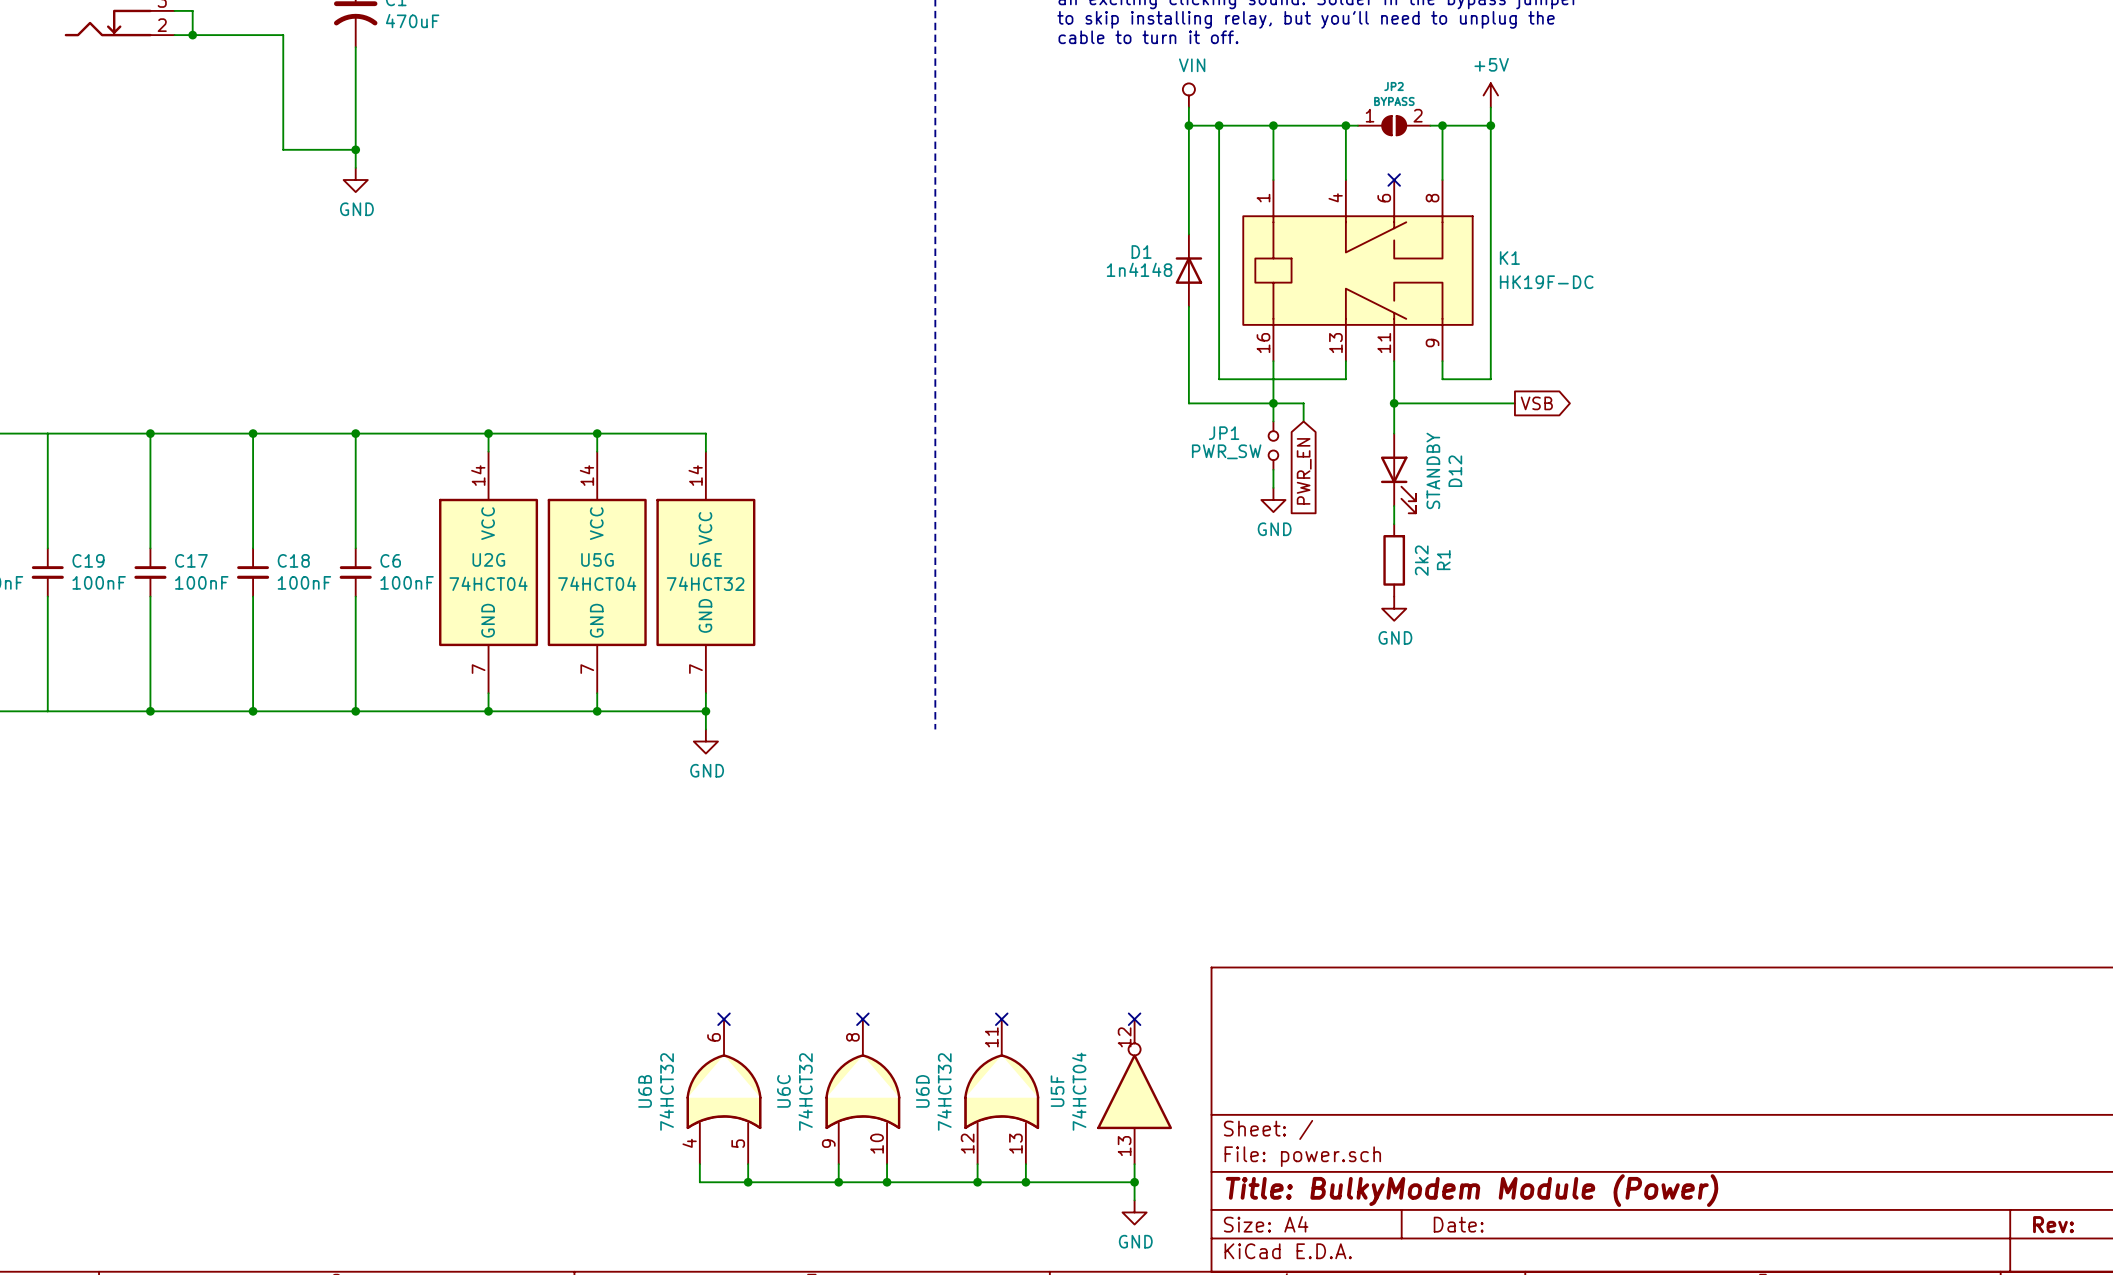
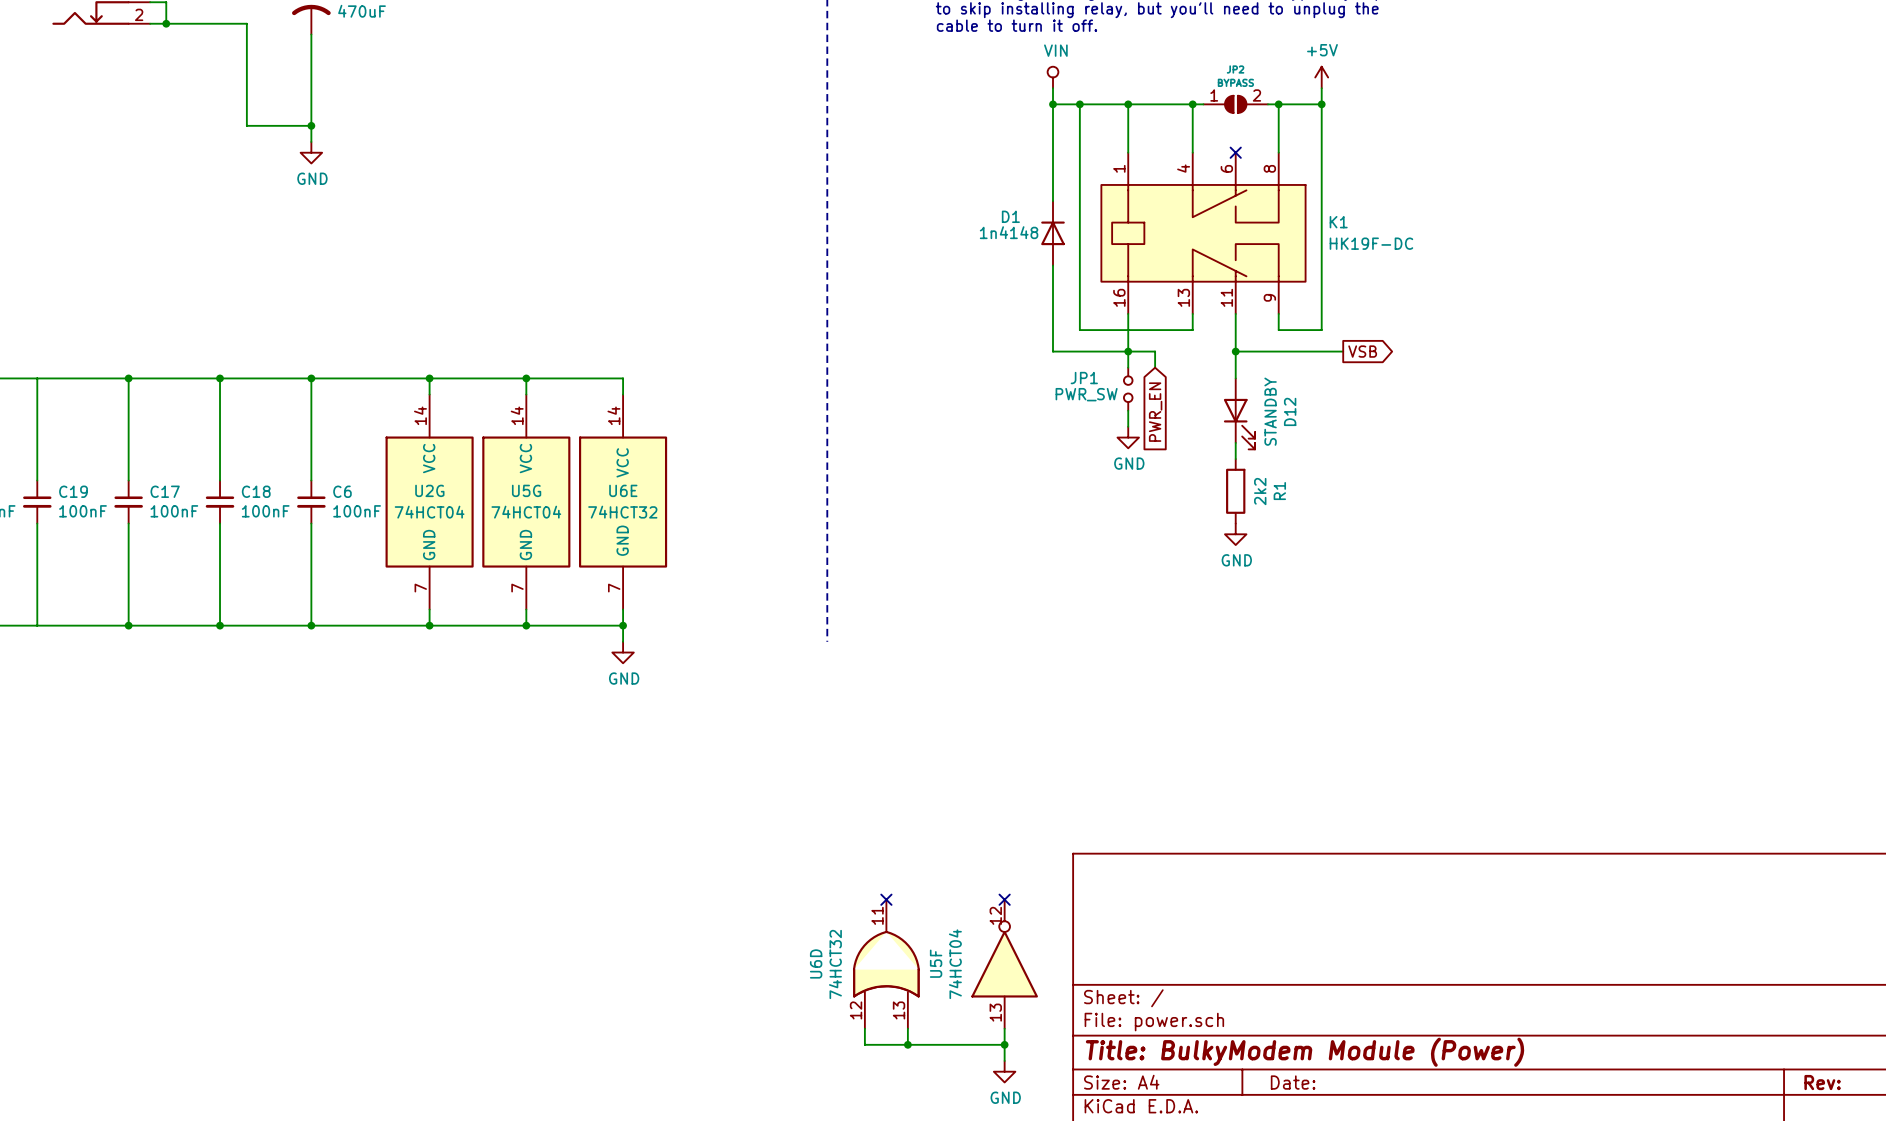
no-connect mark: (724, 1019) -> none
no-connect mark: (862, 1019) -> none
U6B: 74HCT32 (724, 1091) -> none
U6C: 74HCT32 (862, 1091) -> none
wire: (699, 1164) (699, 1182) (977, 1182) -> none
wire: (748, 1164) (748, 1182) -> none
wire: (838, 1164) (838, 1182) -> none
wire: (887, 1164) (887, 1182) -> none
junction: (748, 1182) -> none
junction: (838, 1182) -> none
junction: (887, 1182) -> none
junction: (977, 1182) -> none

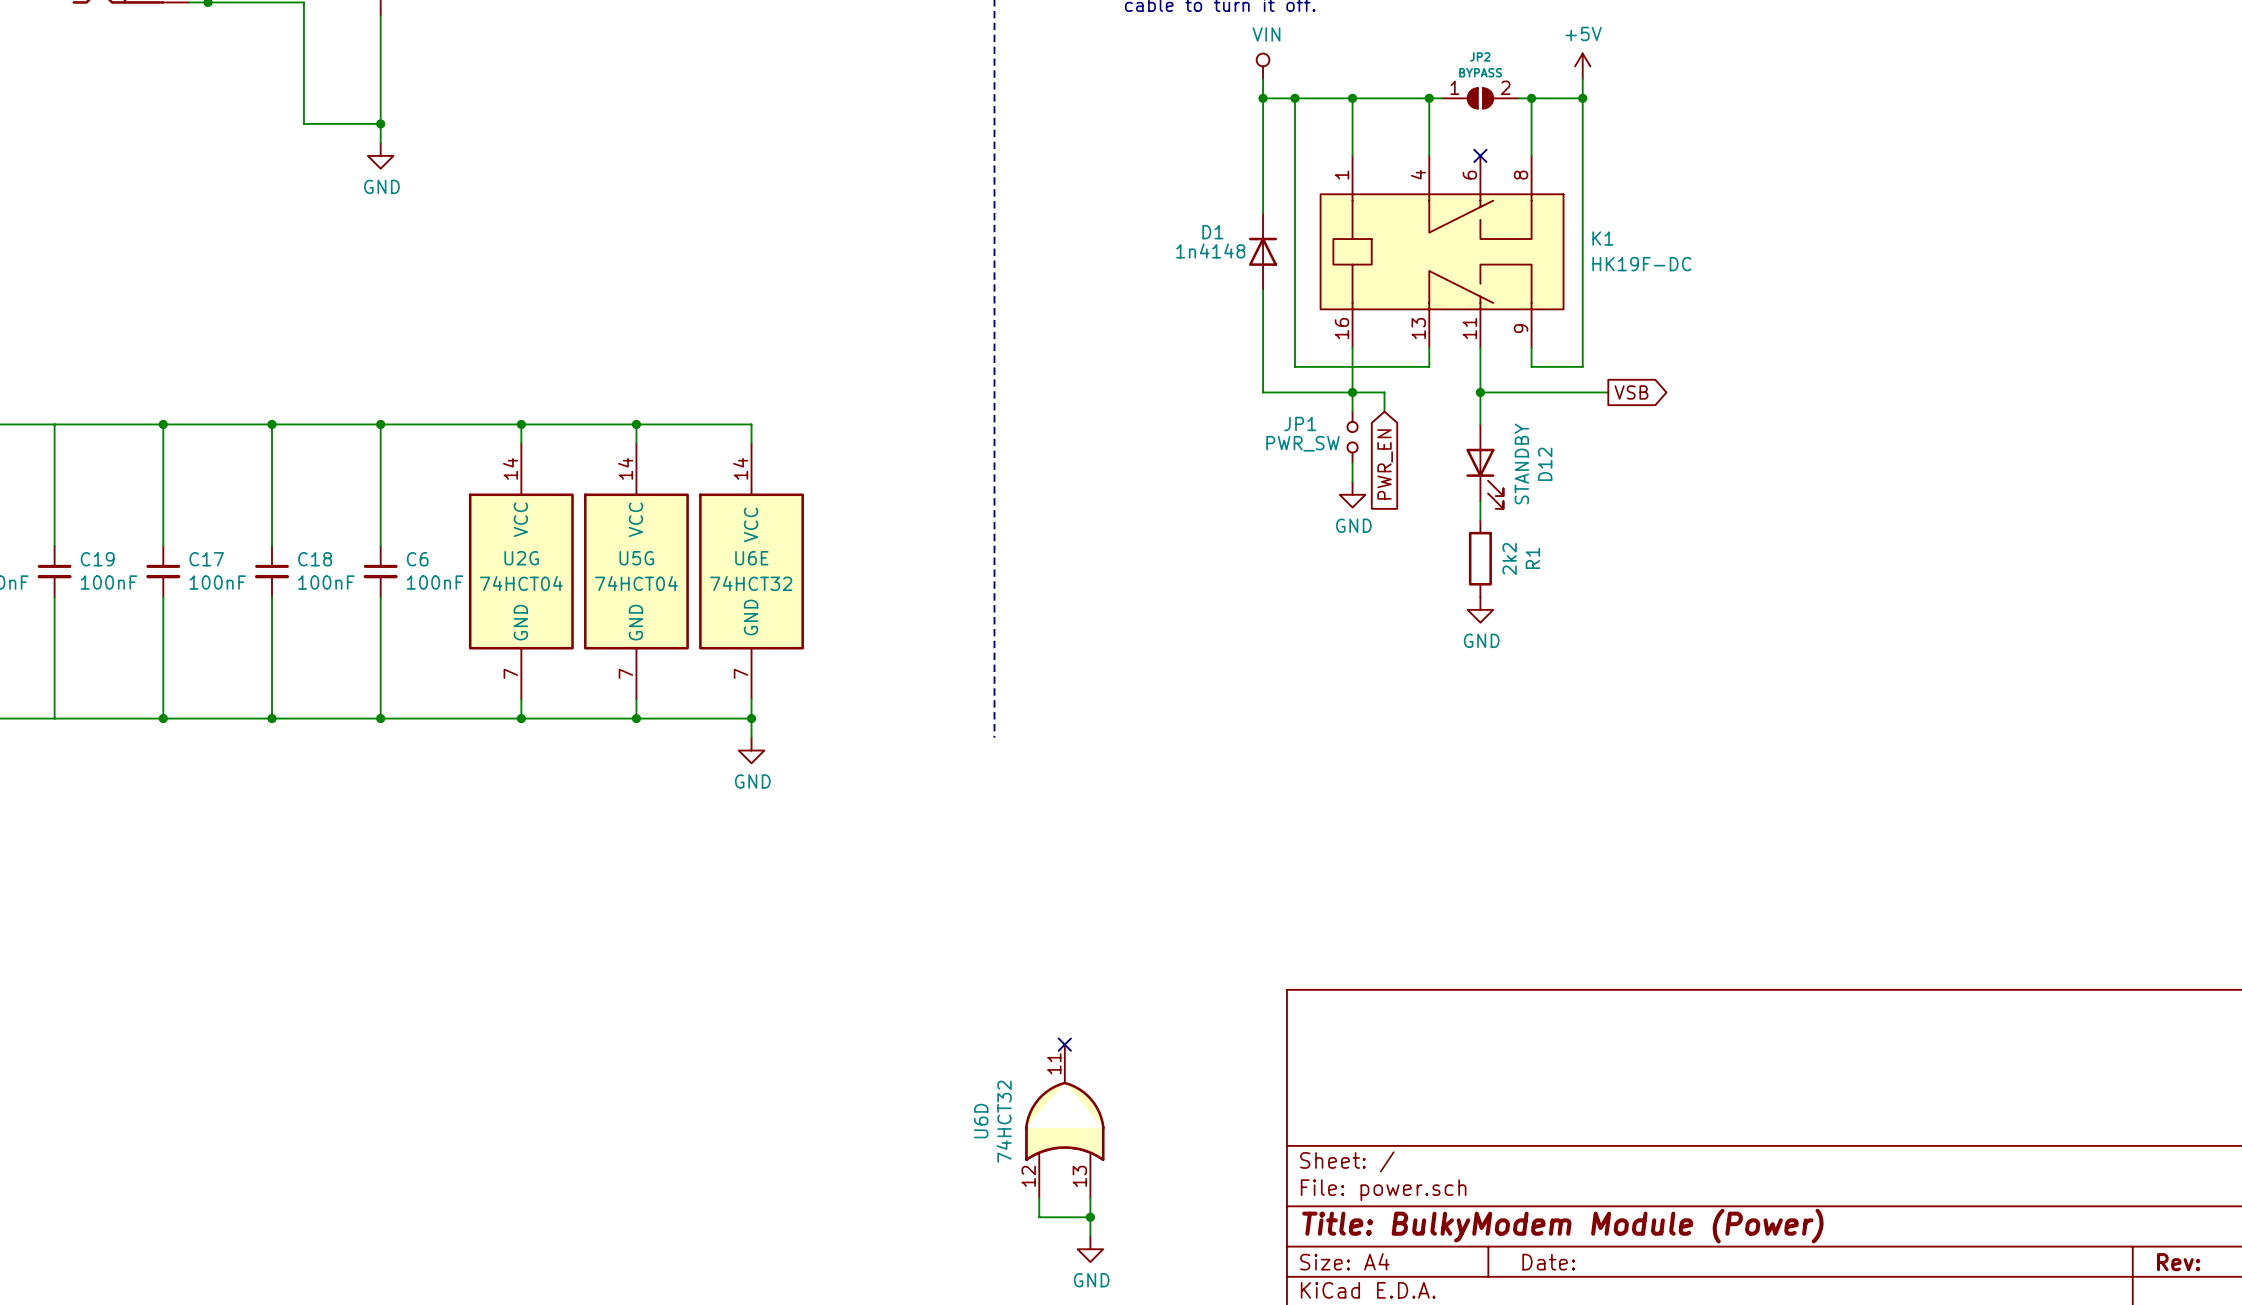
no-connect mark: (1004, 899) -> none
U5F: 74HCT04 (1004, 964) -> none
wire: (1004, 1028) (1004, 1060) -> none
wire: (907, 1044) (1004, 1044) -> (1090, 1217) (1090, 1236)
junction: (1004, 1044) -> none
power symbol position: GND (1004, 1071) -> GND (1090, 1249)

